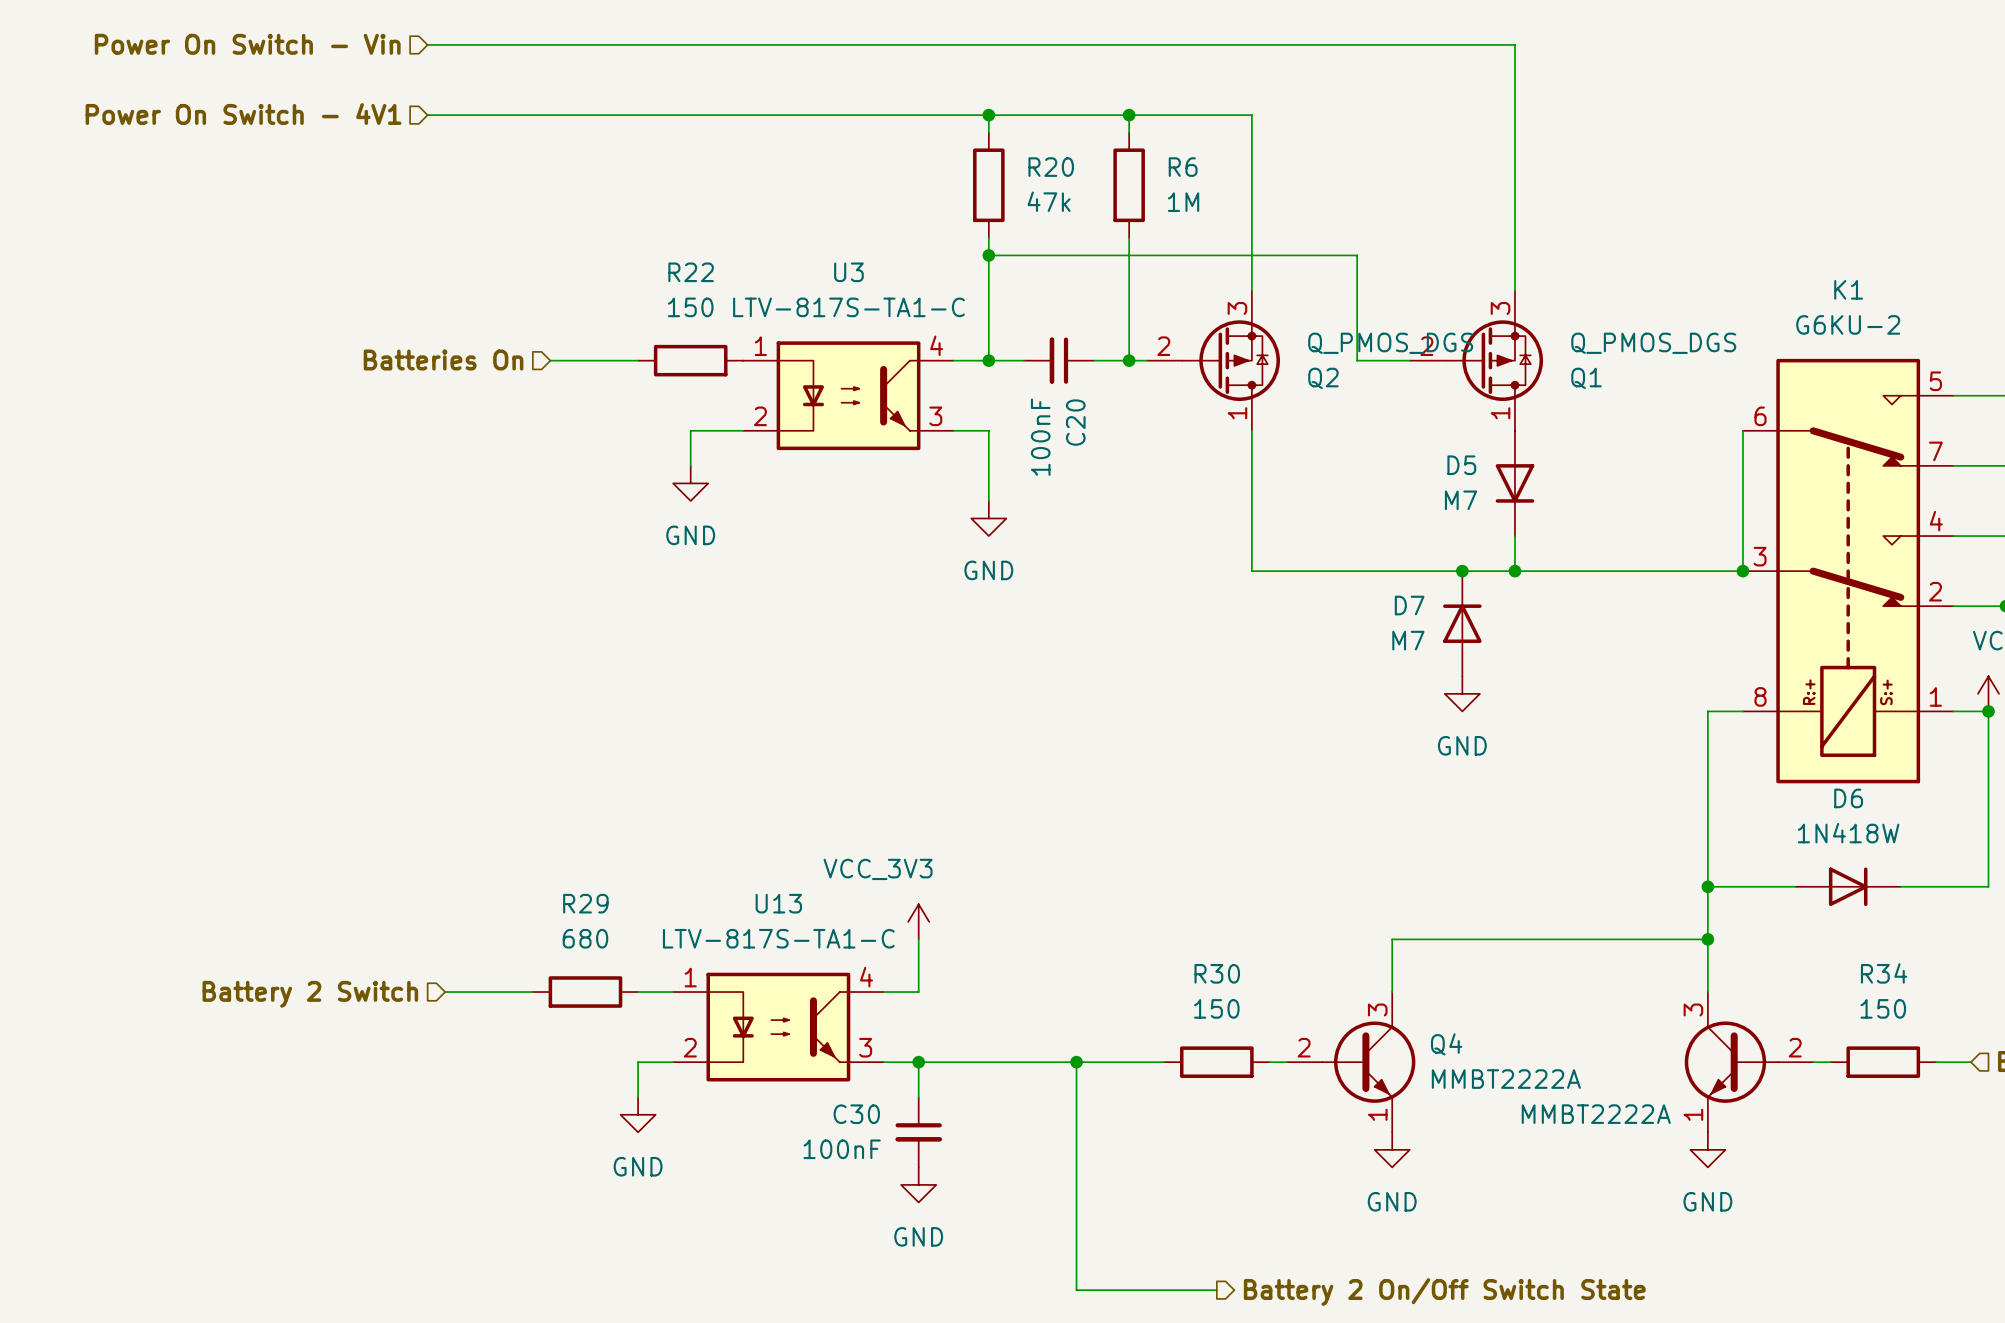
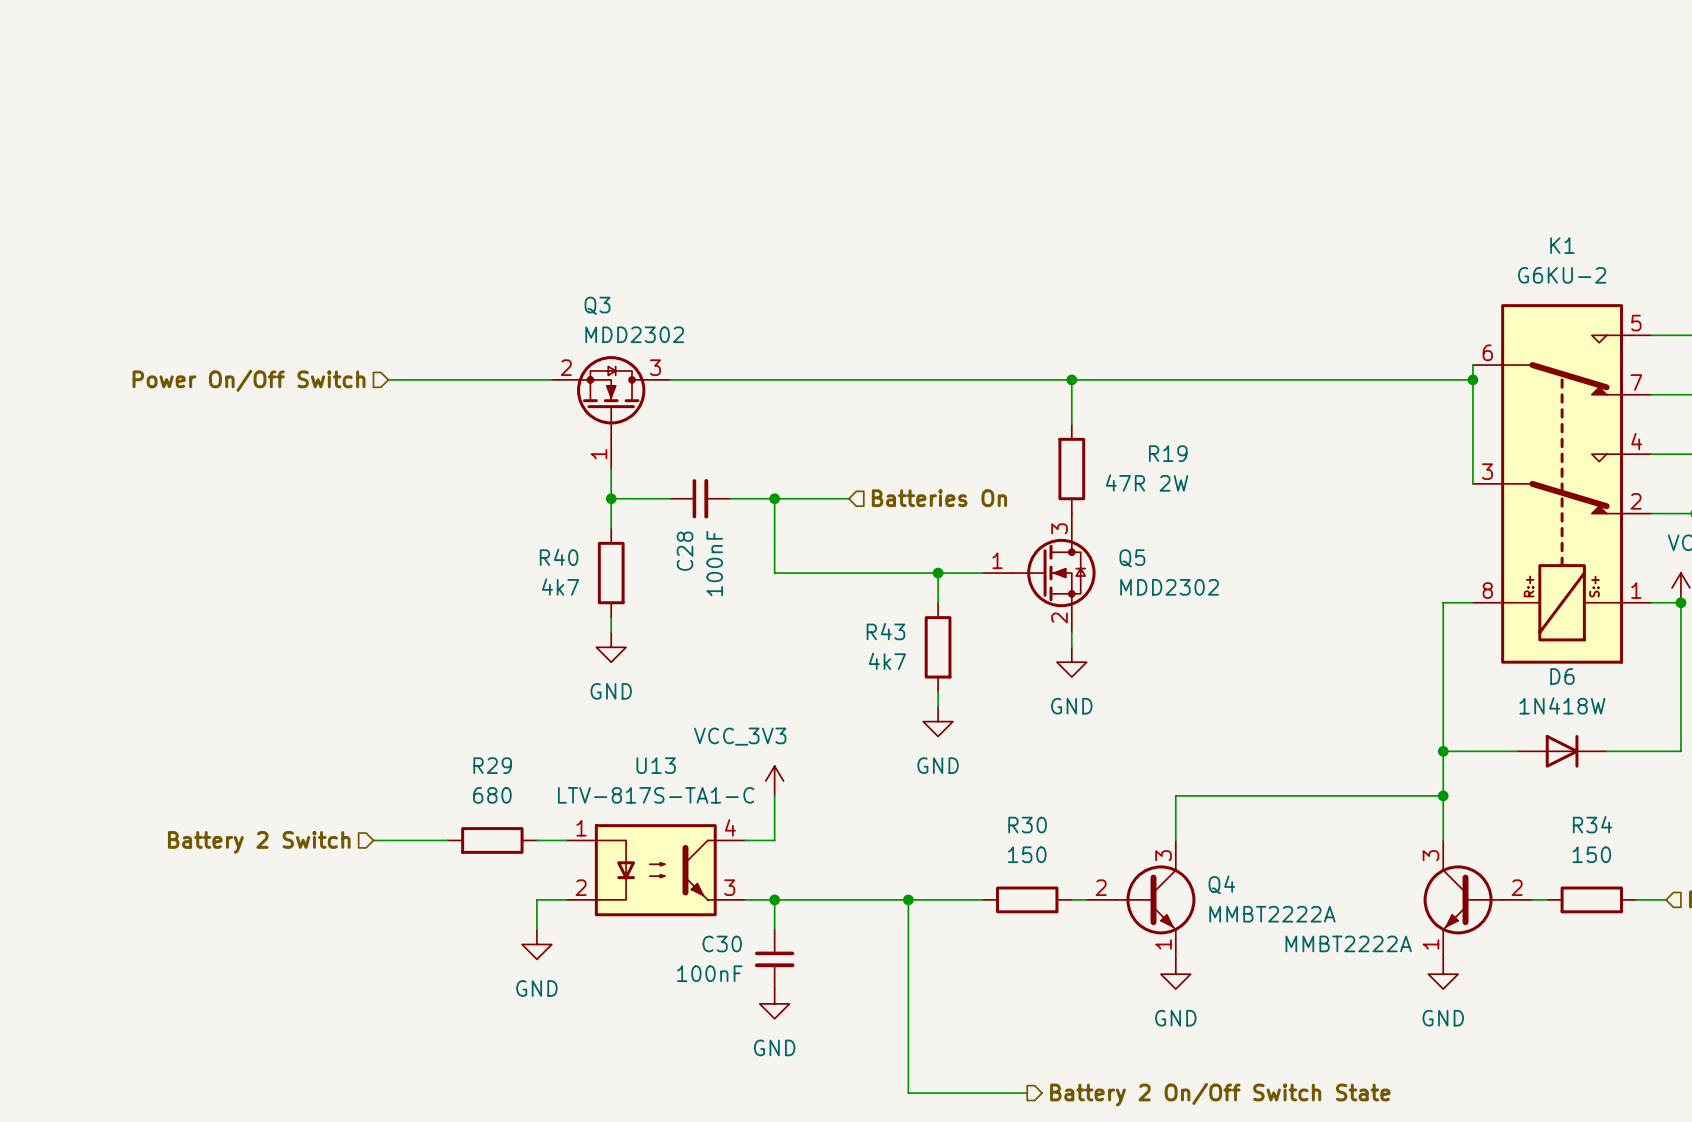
hierarchical label: Power On Switch - Vin (247, 44) -> none
wire: (427, 44) (1514, 44) (1514, 290) -> none
hierarchical label: Power On Switch - 4V1 (243, 114) -> none
wire: (427, 115) (1251, 115) (1251, 290) -> none
wire: (988, 115) (988, 132) -> none
junction: (988, 115) -> none
wire: (1129, 115) (1129, 132) -> none
junction: (1129, 115) -> none
R20: 47k (988, 185) -> none
R6: 1M (1129, 185) -> none
wire: (988, 237) (988, 360) -> none
wire: (1129, 237) (1129, 360) -> none
wire: (988, 255) (1357, 255) (1357, 360) (1409, 360) -> none
junction: (988, 255) -> none
hierarchical label: Batteries On (443, 360) -> none
wire: (550, 360) (638, 360) -> none
R22: 150 (690, 360) -> none
wire: (953, 360) (1023, 360) -> (611, 498) (670, 498)
junction: (988, 360) -> none
C20: 100nF (1058, 360) -> none
wire: (1094, 360) (1146, 360) -> none
junction: (1129, 360) -> none
Q2: Q_PMOS_DGS (1213, 360) -> none
Q1: Q_PMOS_DGS (1476, 360) -> none
U3: LTV-817S-TA1-C (848, 395) -> none
wire: (743, 430) (690, 430) (690, 465) -> none
wire: (953, 430) (988, 430) (988, 500) -> none
wire: (1251, 430) (1251, 571) (1742, 571) -> none
wire: none -> (388, 379) (551, 379)
wire: none -> (670, 379) (1472, 379)
wire: none -> (1071, 379) (1071, 424)
junction: none -> (1071, 379)
junction: none -> (1472, 379)
hierarchical label: none -> Power On/Off Switch (249, 380)
power symbol: GND (690, 483) -> none
D5: M7 (1514, 483) -> none
Q3: none -> MDD2302 (611, 412)
power symbol: GND (988, 518) -> none
wire: (1514, 536) (1514, 571) -> none
wire: none -> (611, 469) (611, 528)
R19: none -> 47R 2W (1071, 469)
junction: (1462, 571) -> none
junction: (1514, 571) -> none
junction: (1742, 571) -> none
hierarchical label: none -> Batteries On (939, 498)
junction: none -> (611, 498)
C28: none -> 100nF (700, 498)
wire: none -> (730, 498) (848, 498)
wire: none -> (774, 498) (774, 573) (982, 573)
junction: none -> (774, 498)
D7: M7 (1462, 623) -> none
R40: none -> 4k7 (611, 573)
wire: none -> (938, 573) (938, 602)
junction: none -> (938, 573)
Q5: none -> MDD2302 (1039, 573)
power symbol: GND (1462, 693) -> none
wire: none -> (611, 617) (611, 632)
wire: none -> (1071, 632) (1071, 647)
power symbol: none -> GND (611, 647)
R43: none -> 4k7 (938, 647)
power symbol: none -> GND (1071, 662)
wire: none -> (938, 691) (938, 706)
power symbol: none -> GND (938, 721)

